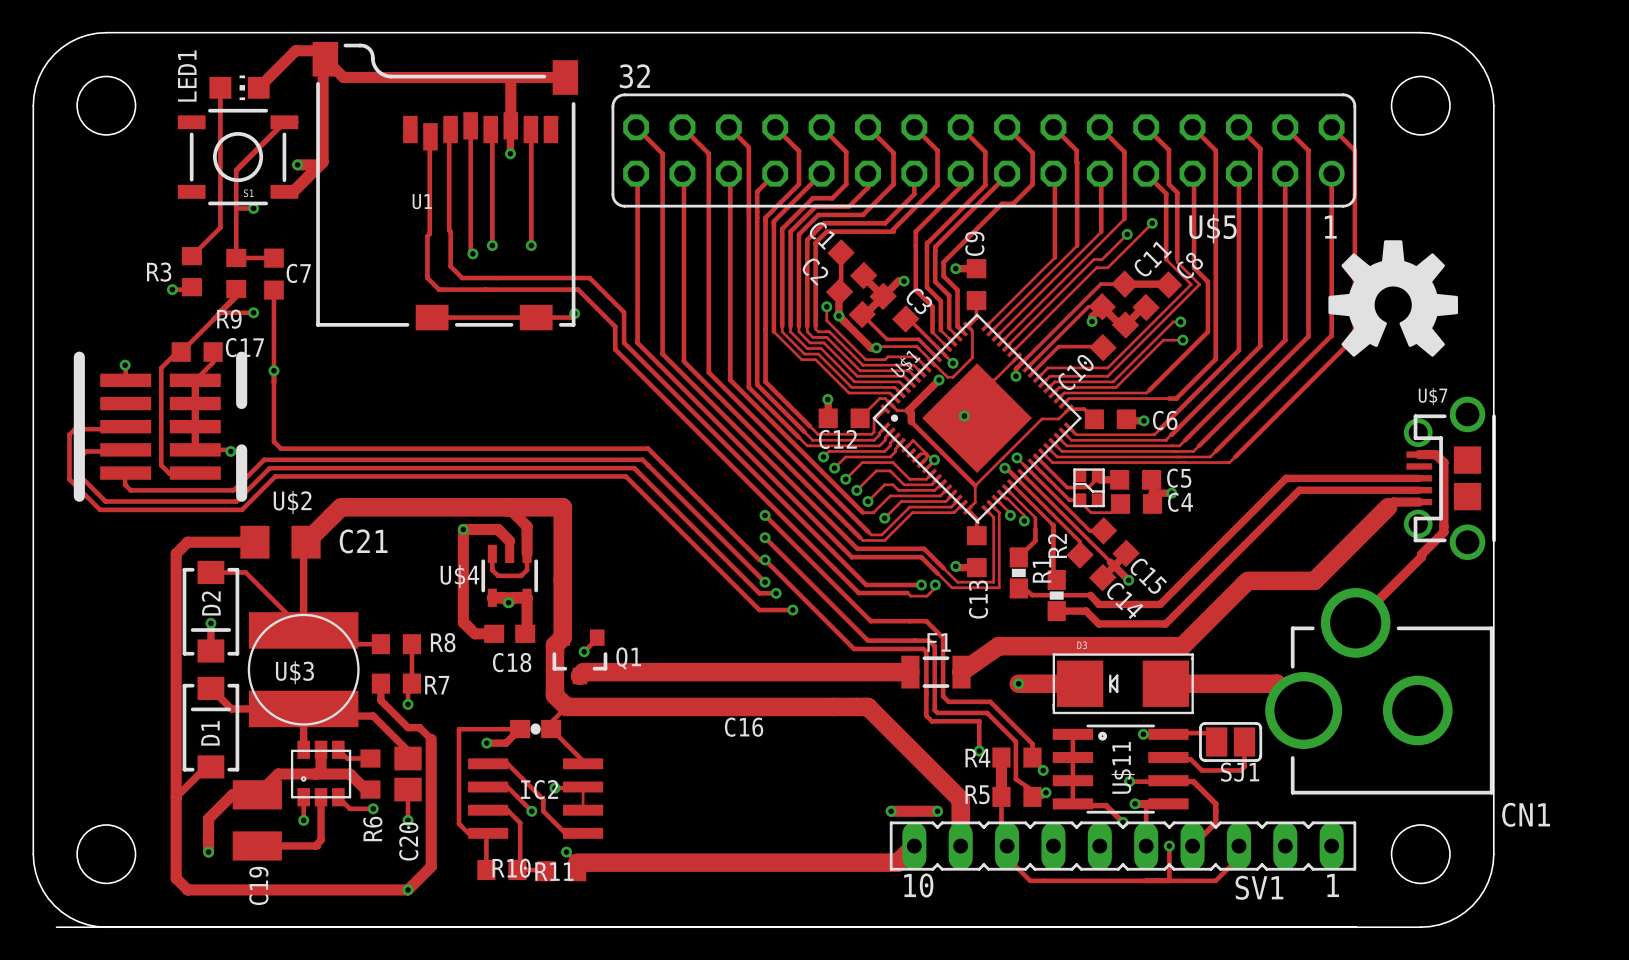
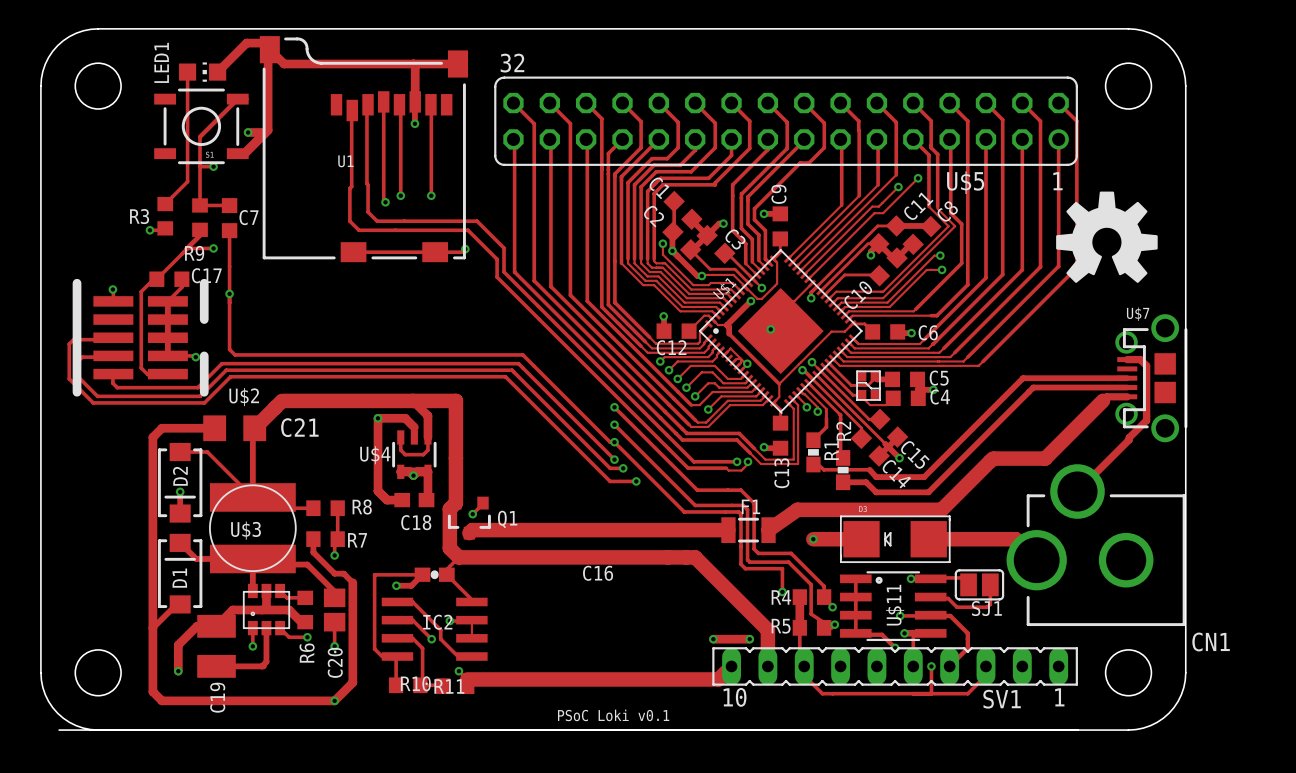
text: none -> PSoC Loki v0.1 (613, 715)

